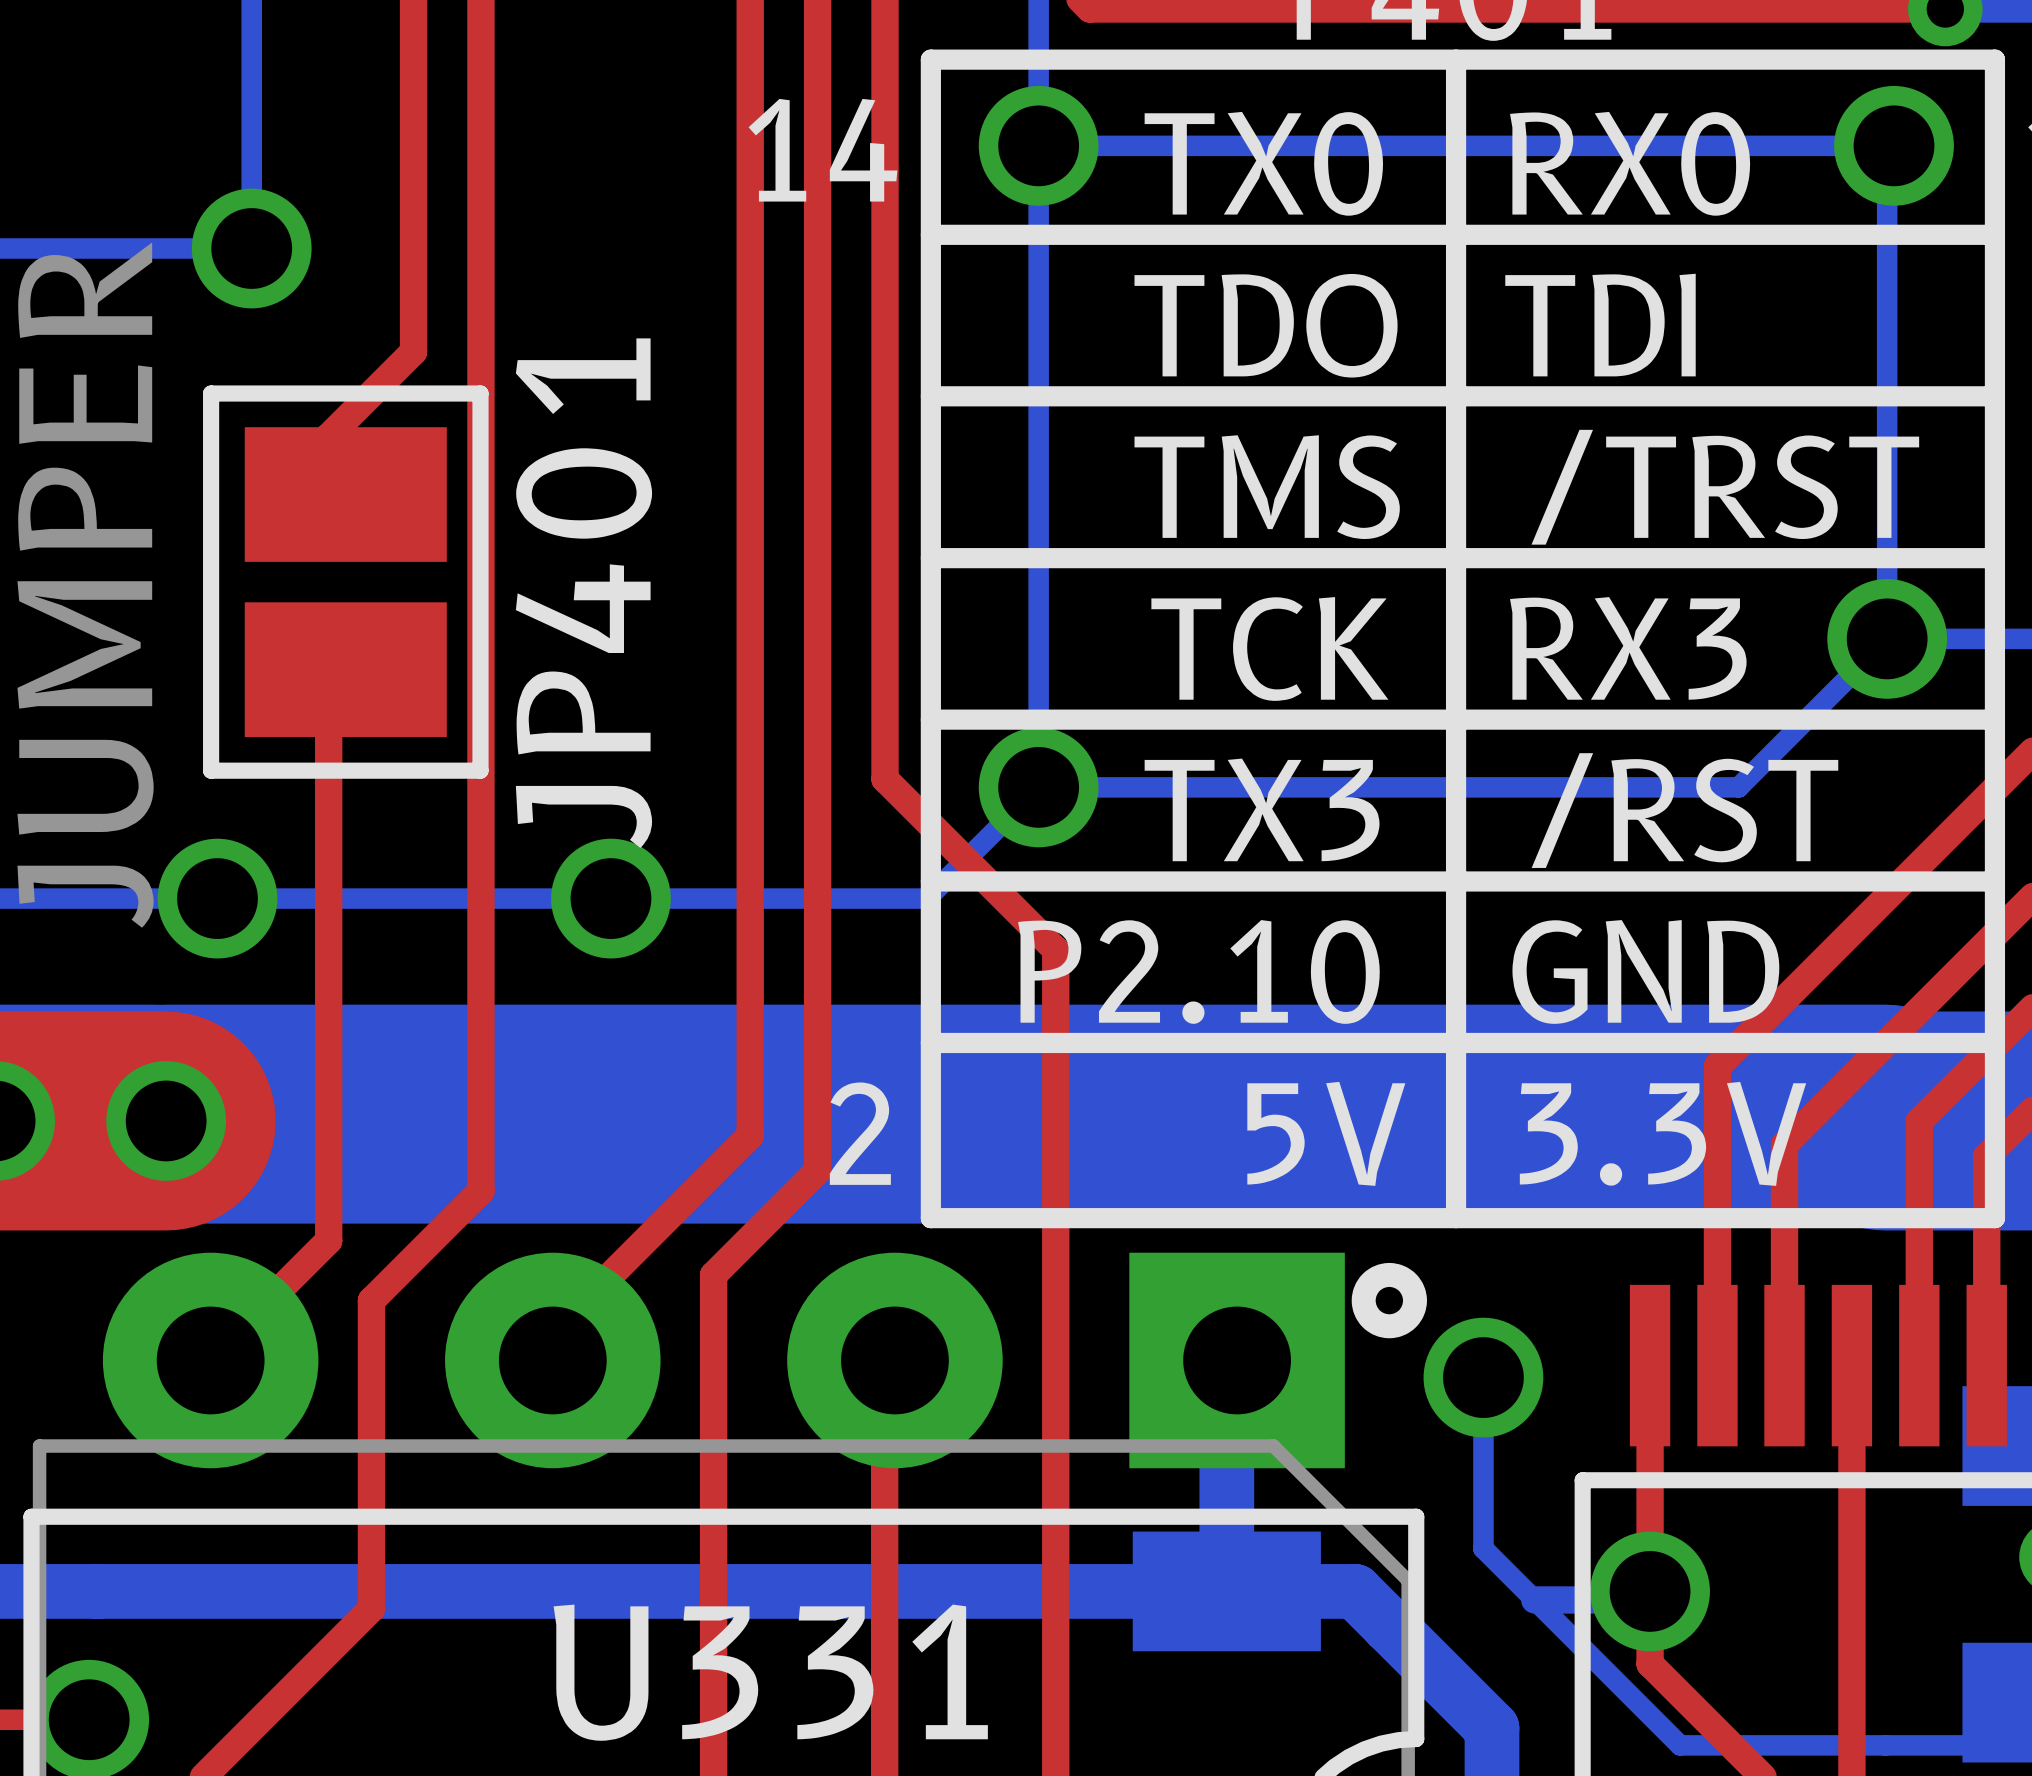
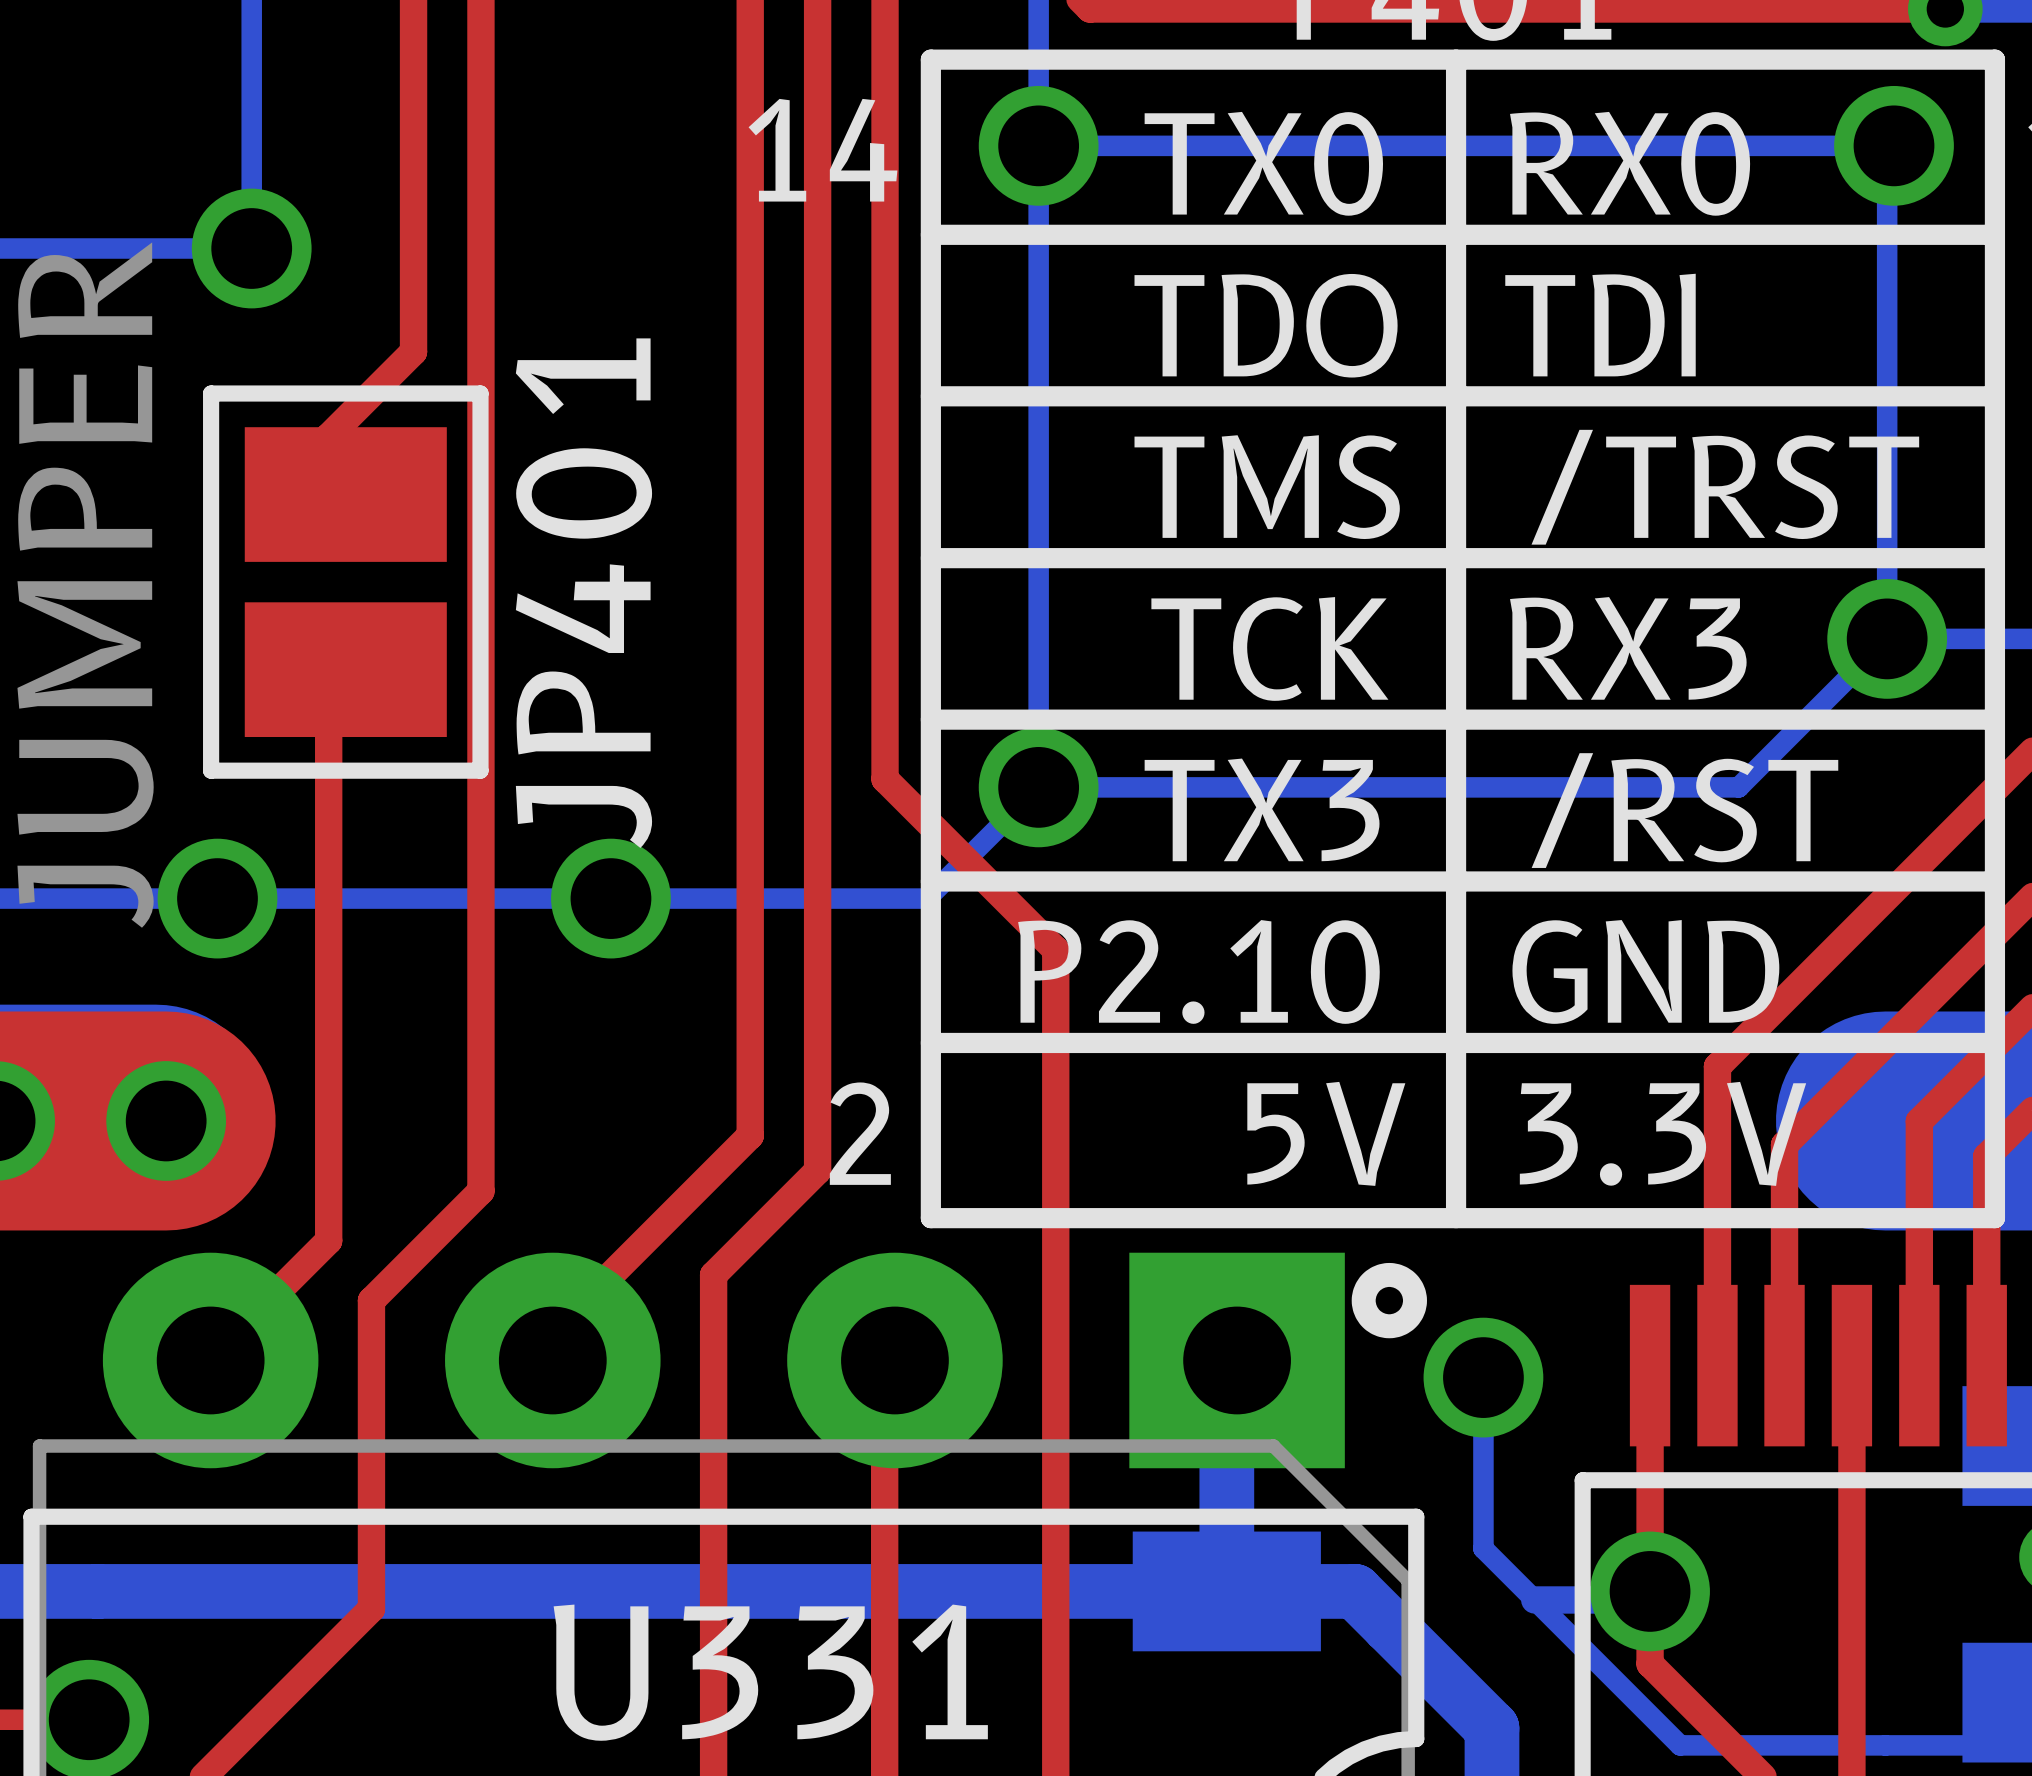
bottom track: (166, 1114) (1885, 1114) -> none

